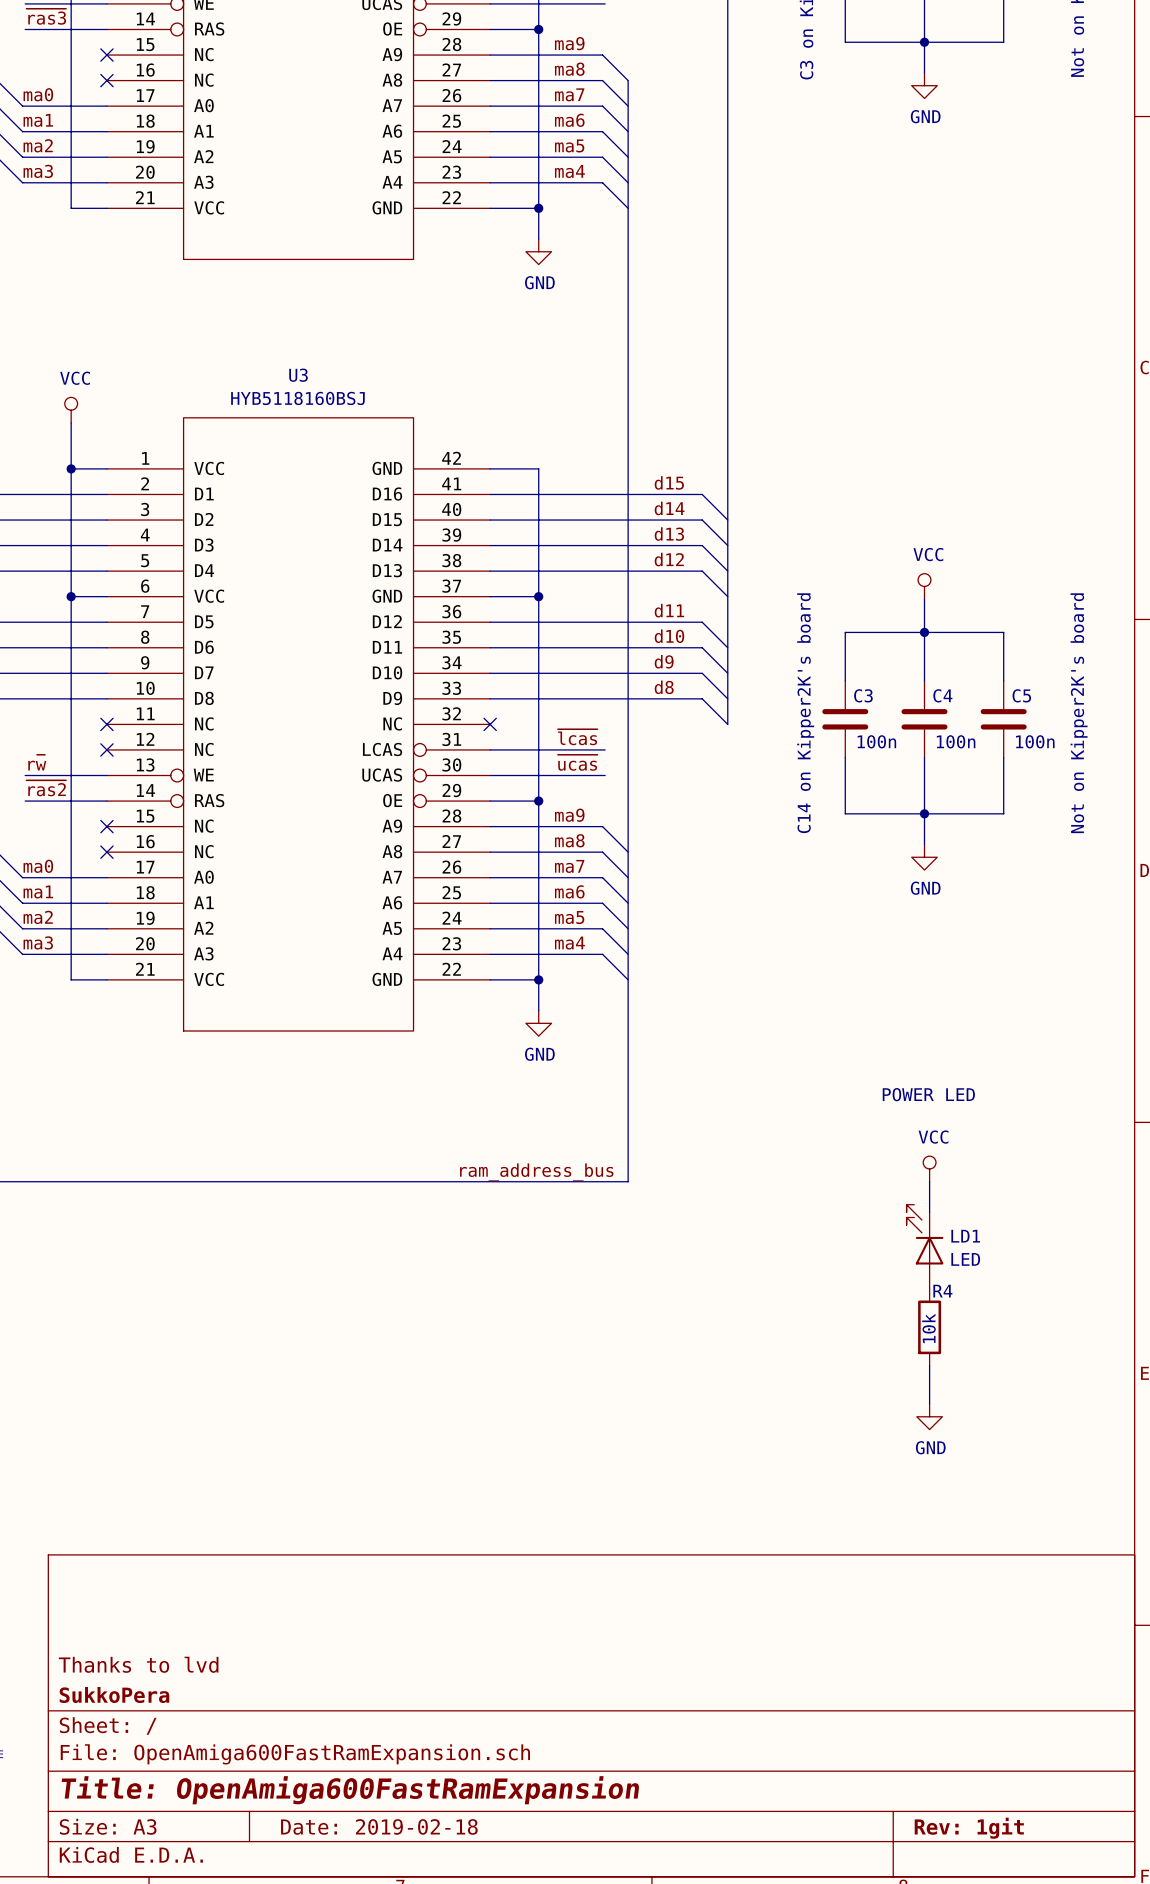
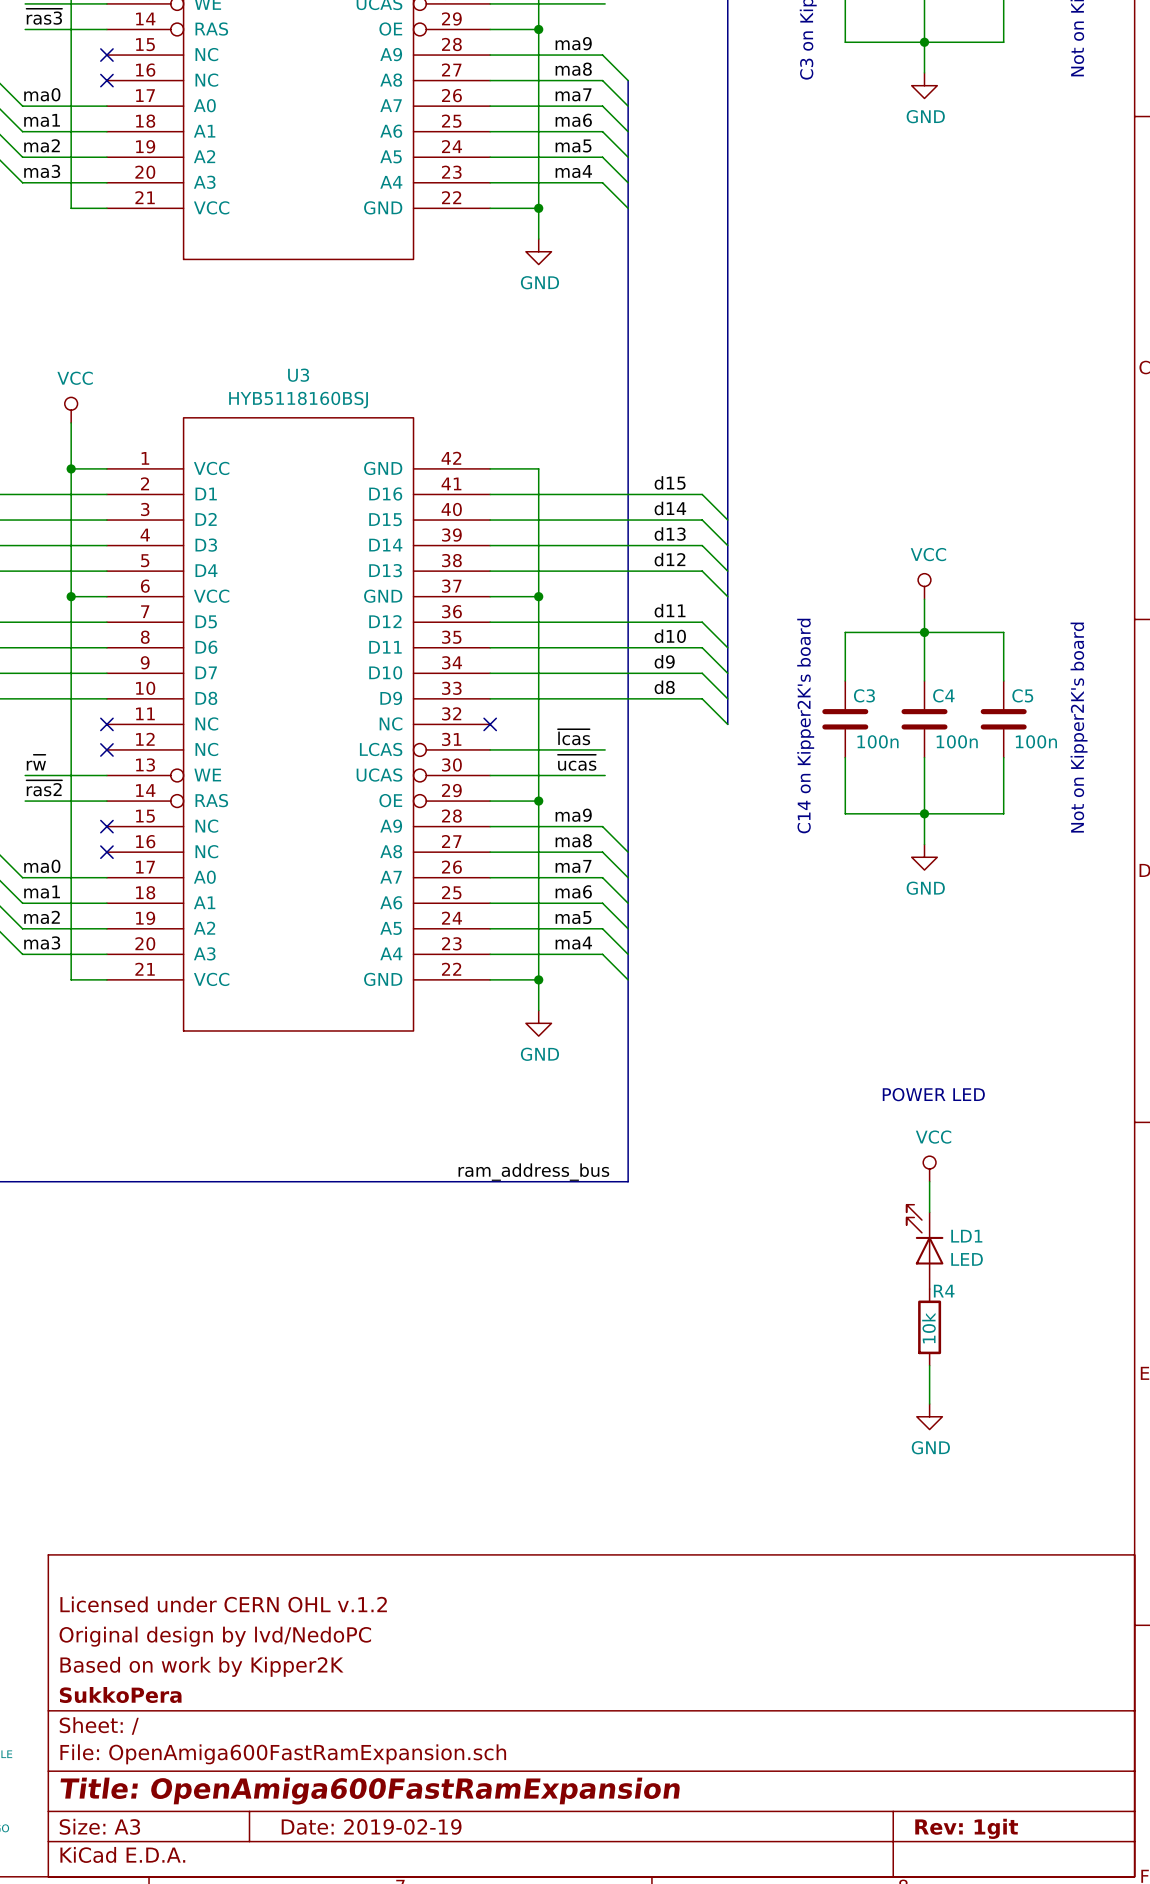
title block: none -> Licensed under CERN OHL v.1.2 (223, 1604)
title block: none -> Original design by lvd/NedoPC (215, 1636)
title block: Thanks to lvd (138, 1664) -> Based on work by Kipper2K (201, 1666)
title block: Date: 2019-02-18 (379, 1826) -> Date: 2019-02-19 (371, 1826)

